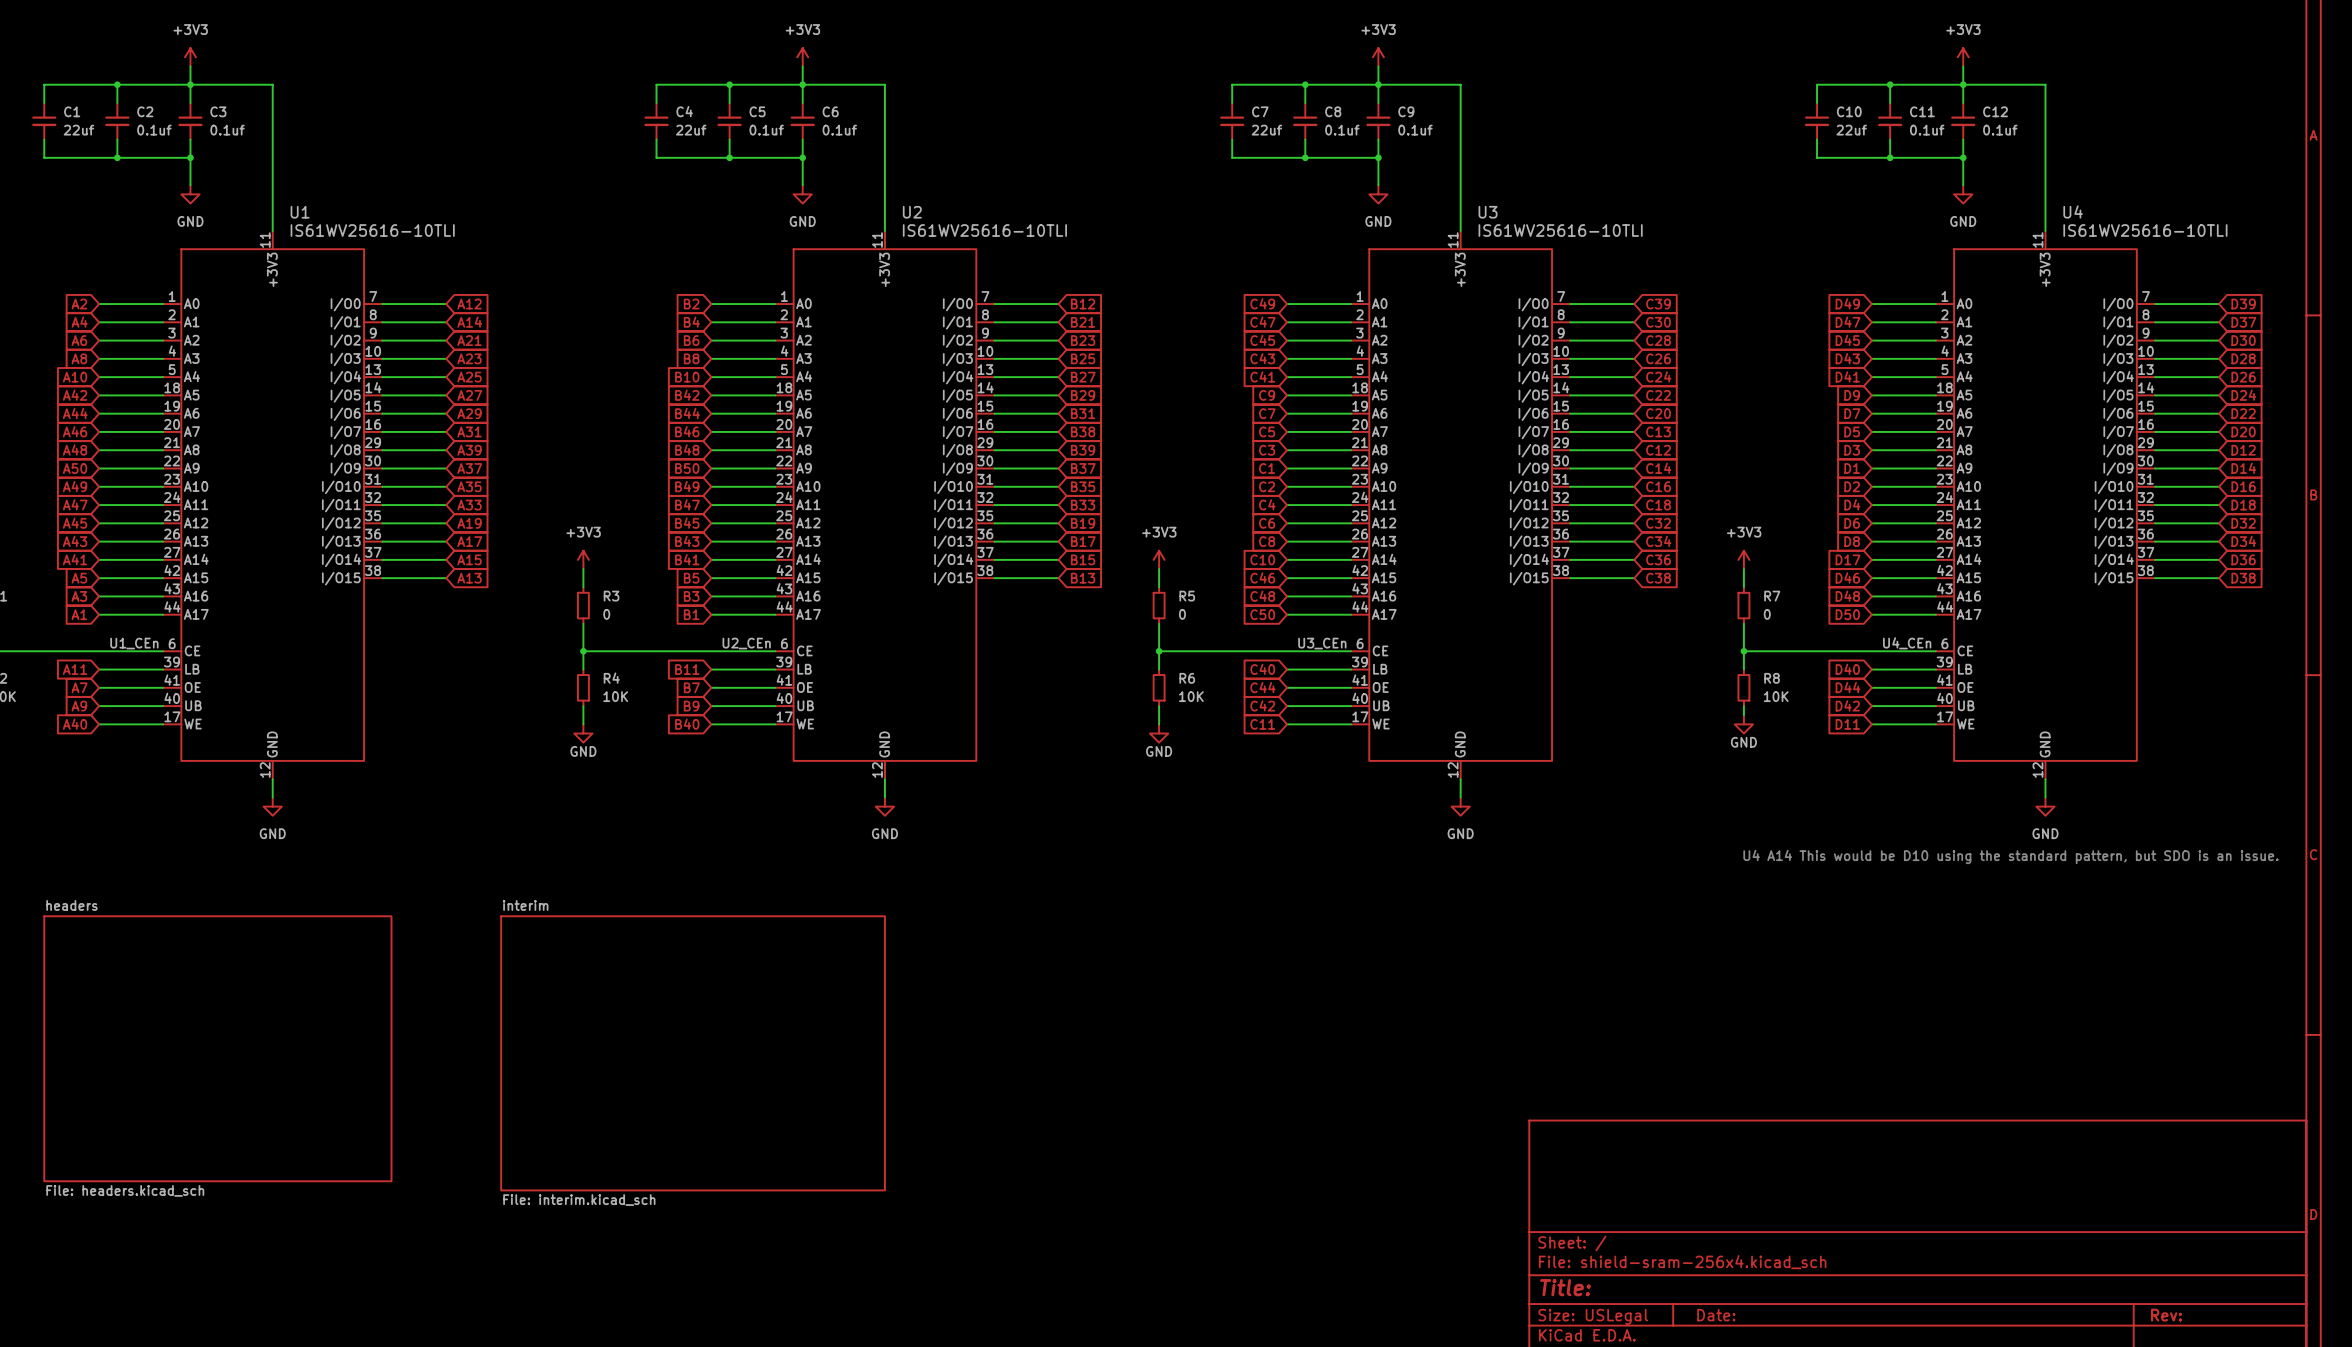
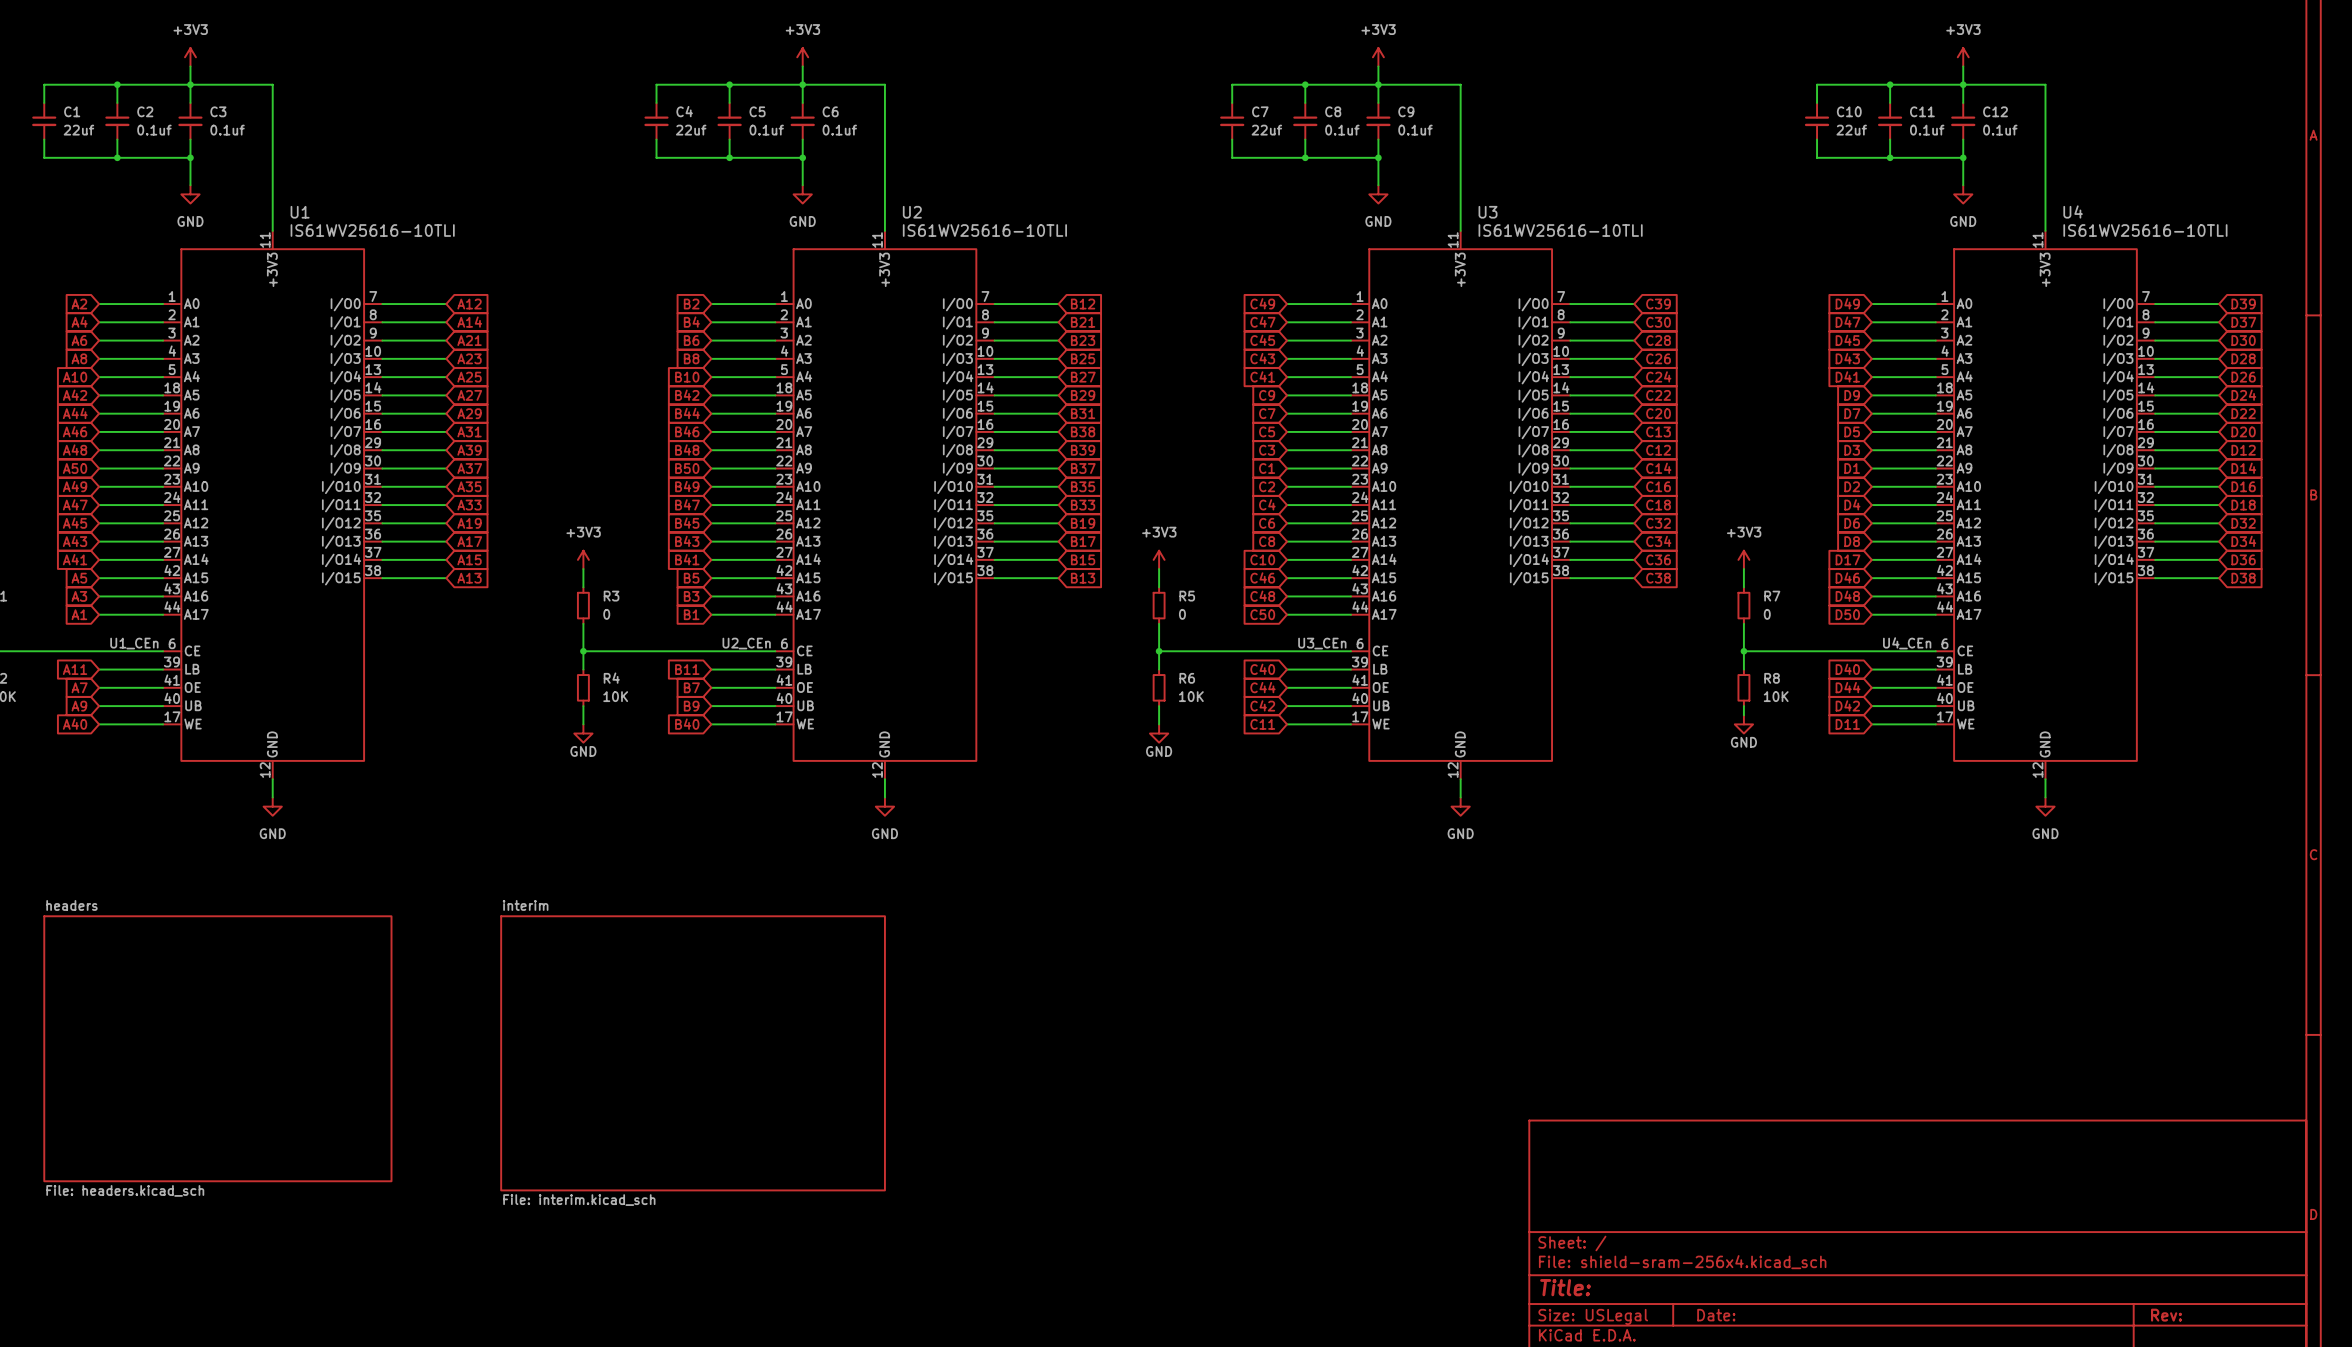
text: U4 A14 This would be D10 using the standard pattern, but SDO is an issue. (2010, 856) -> none

